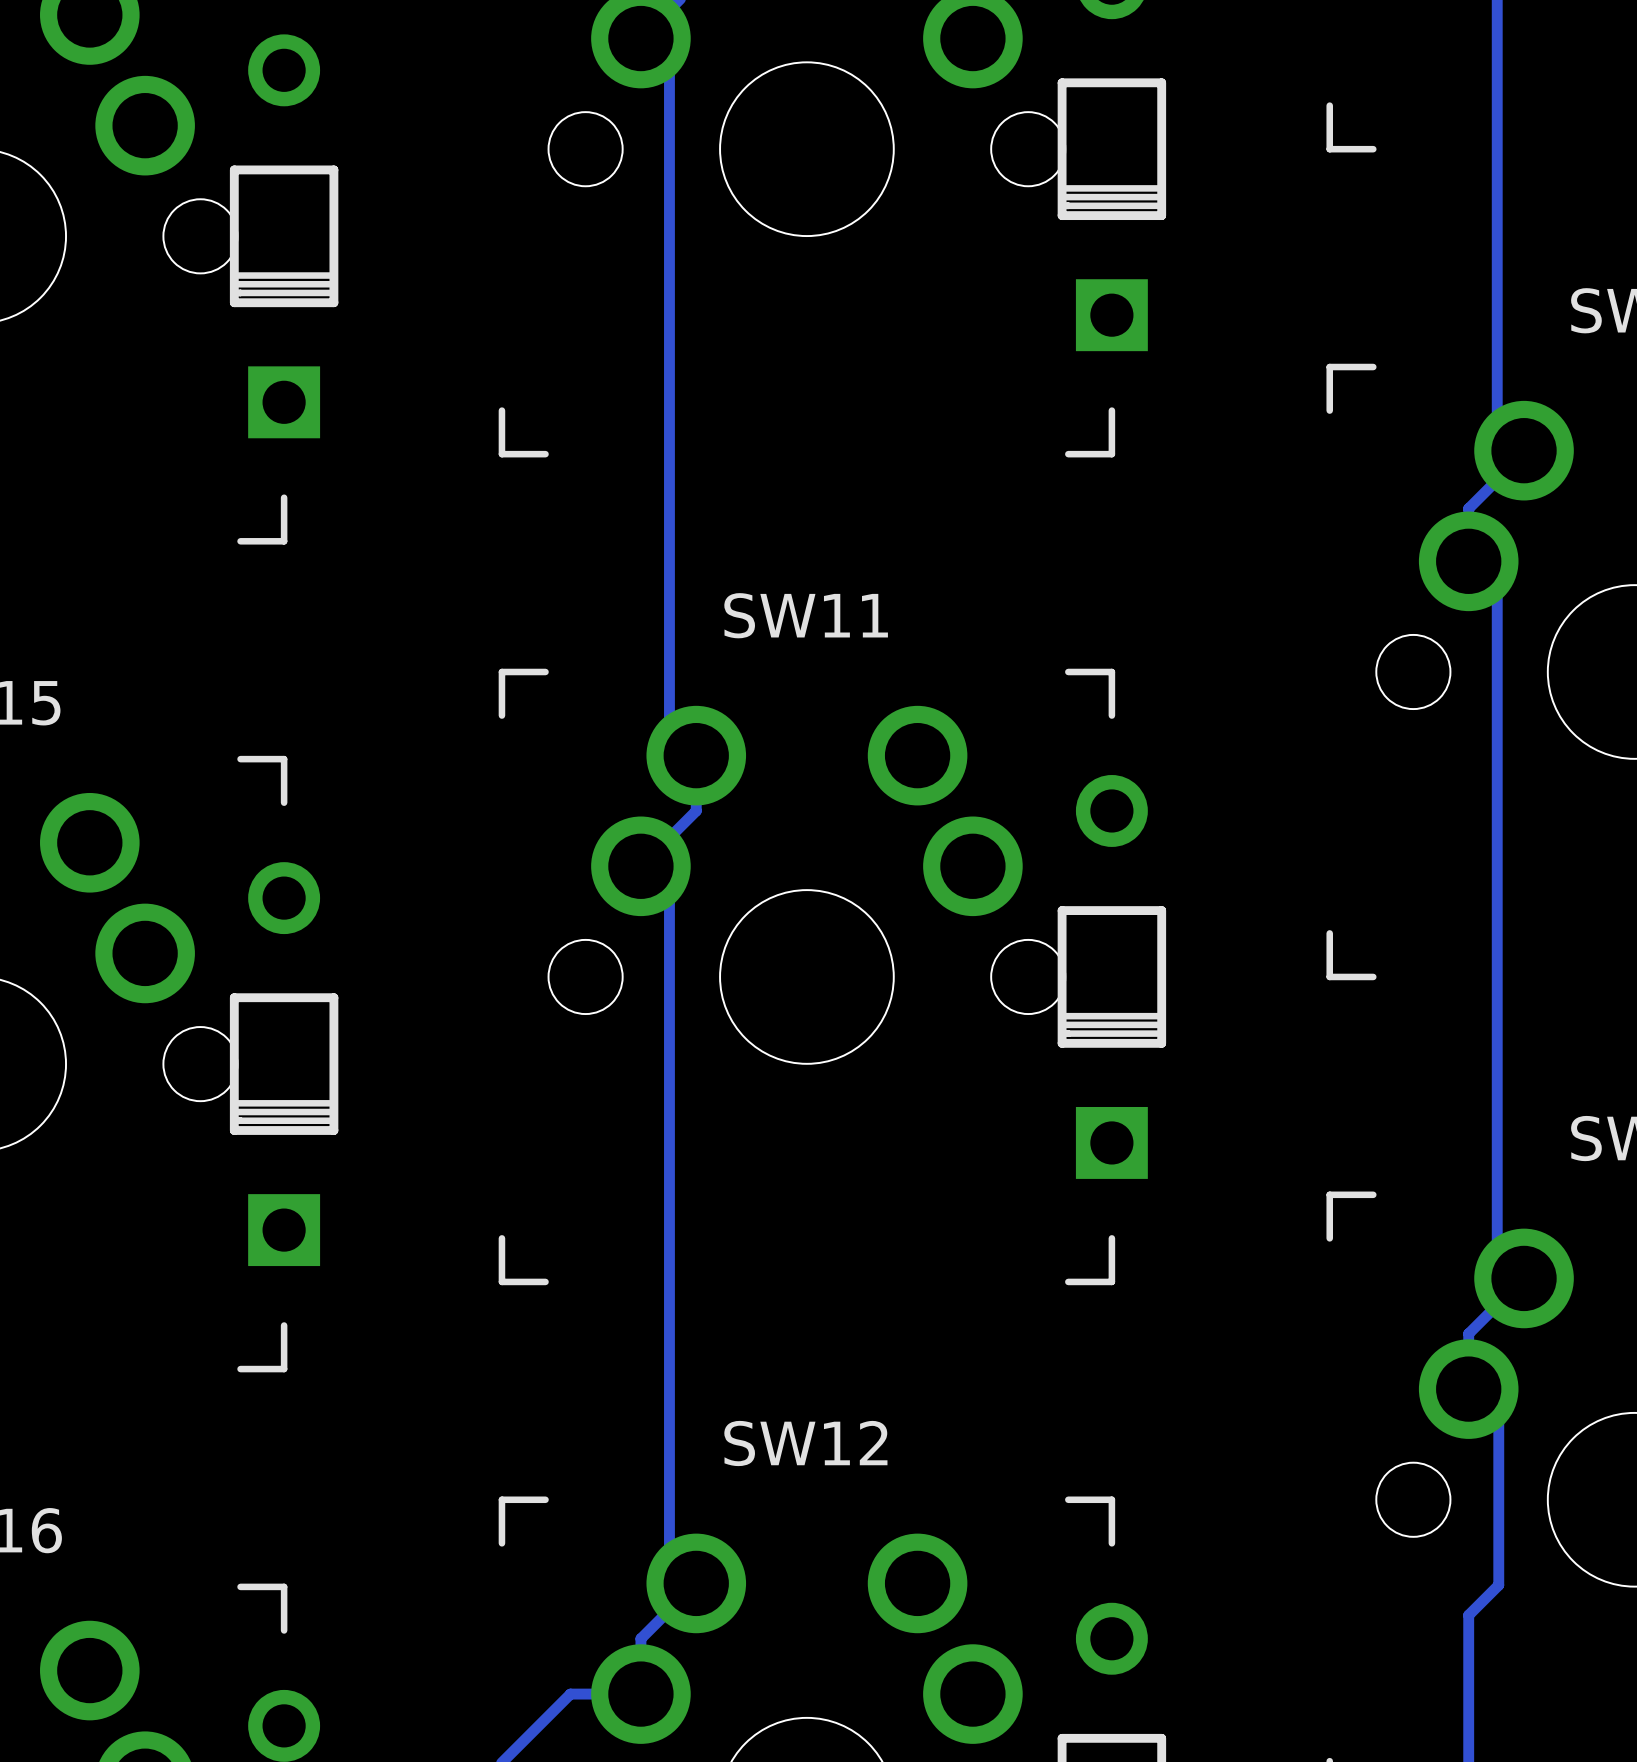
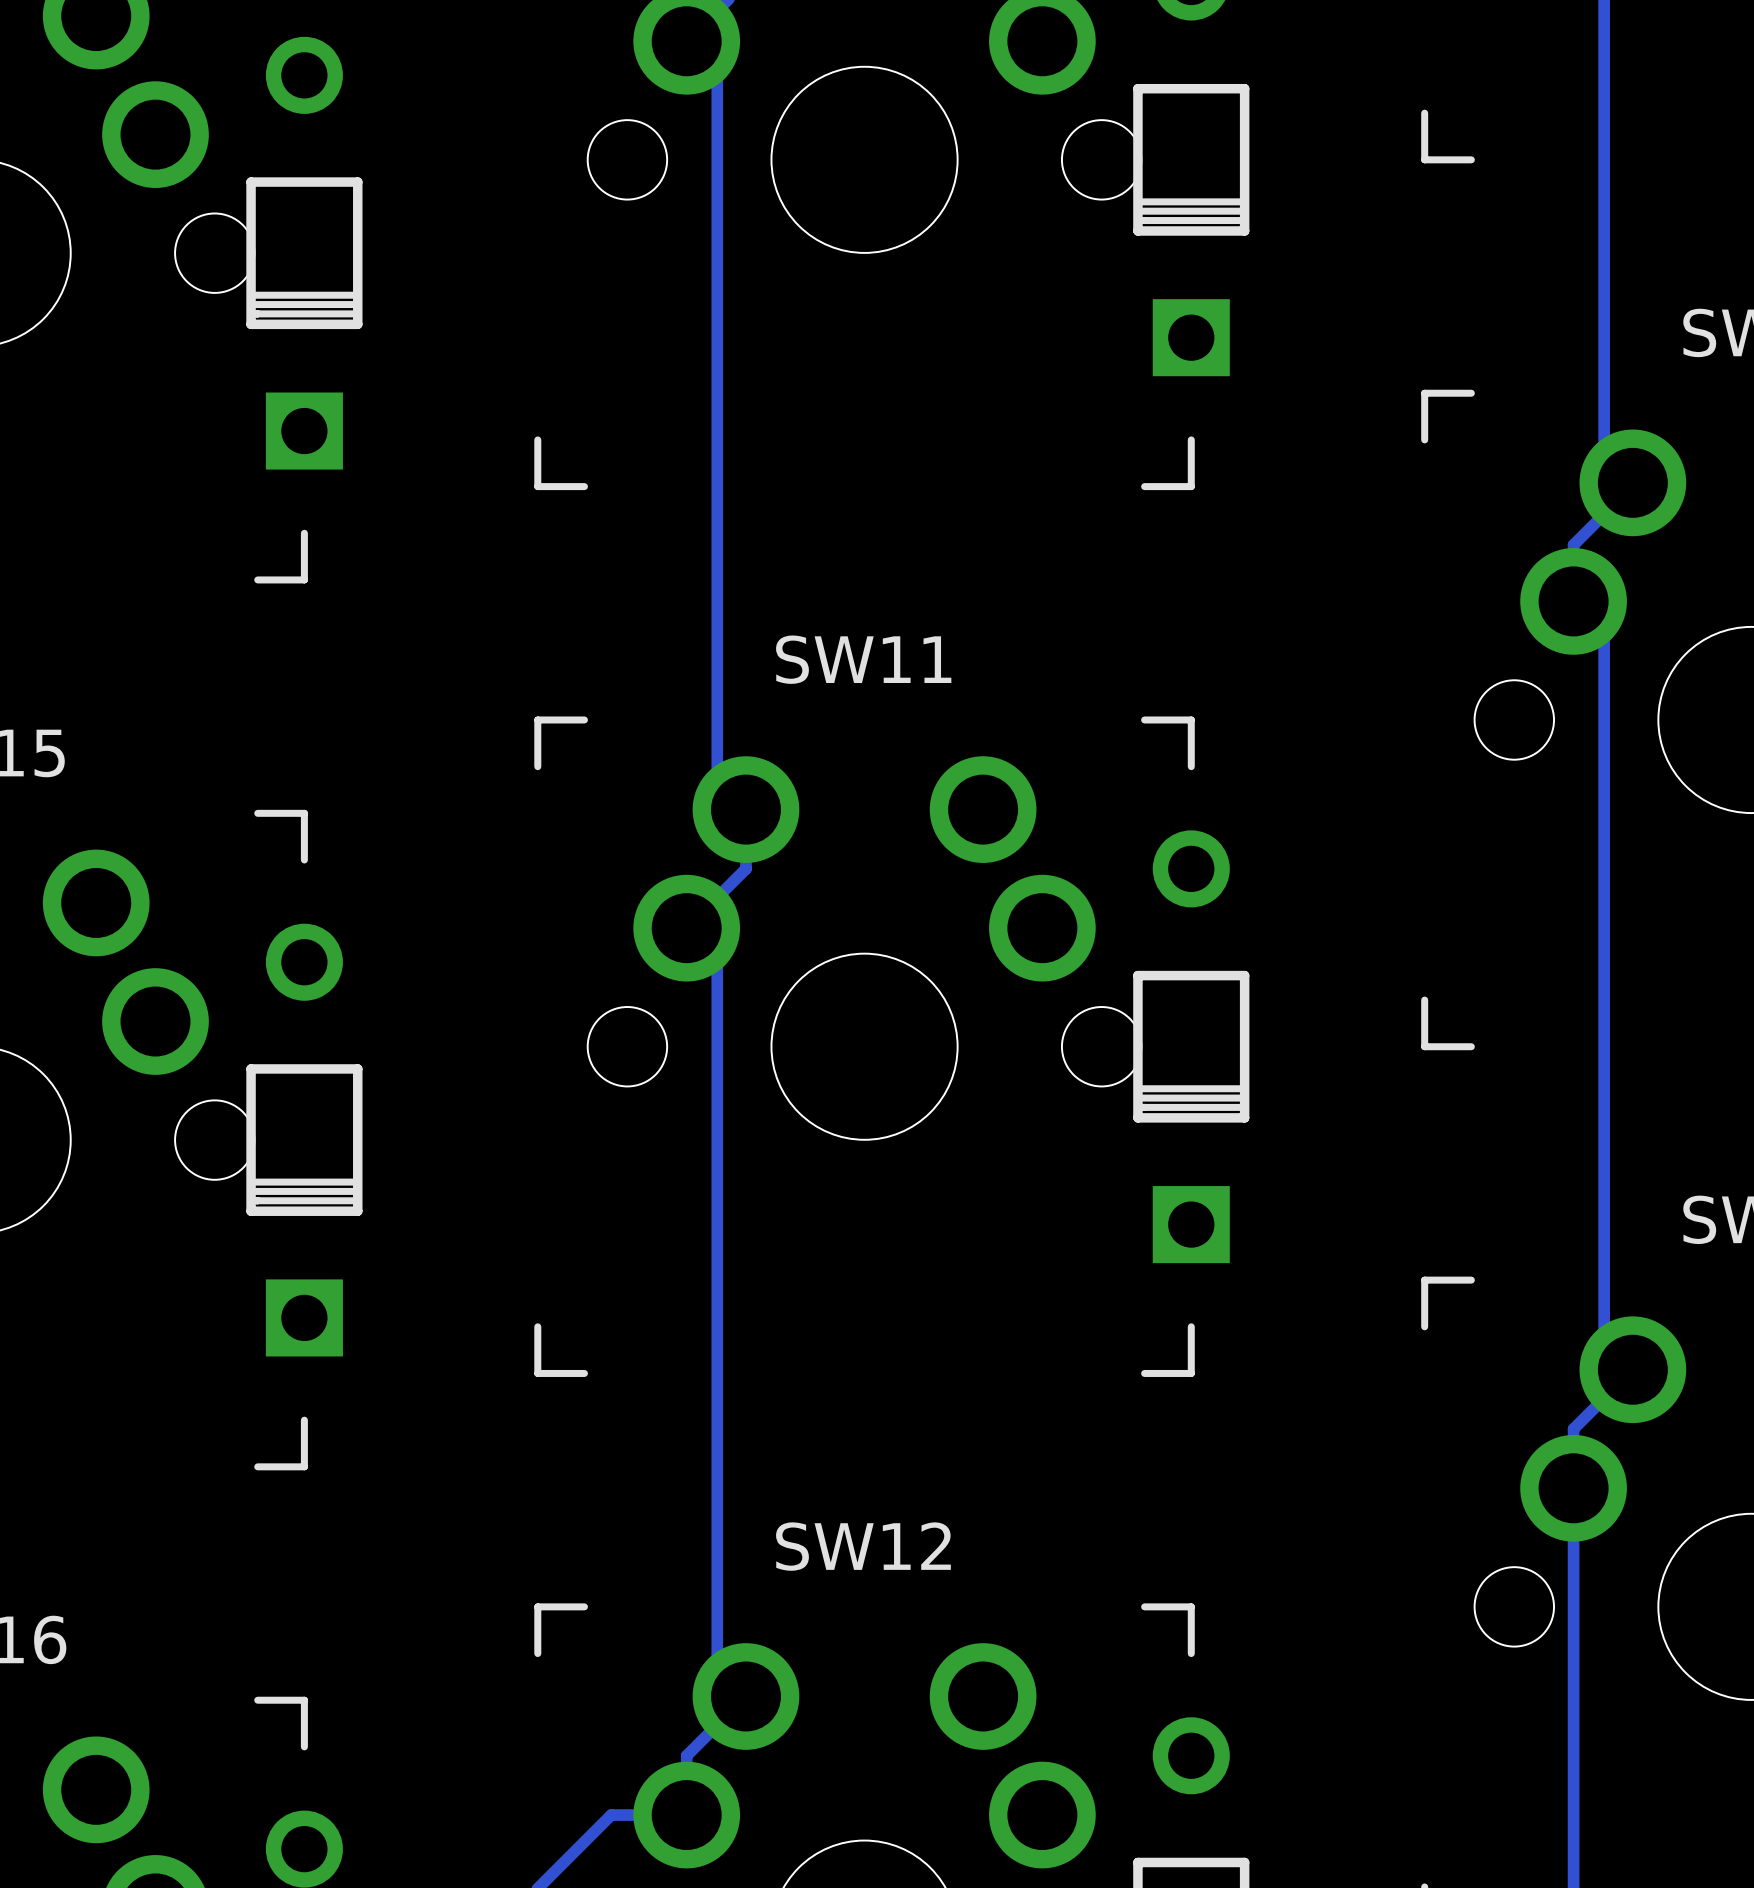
track: (1498, 1363) (1498, 1585) (1468, 1615) -> (1573, 1488) (1573, 1730)

